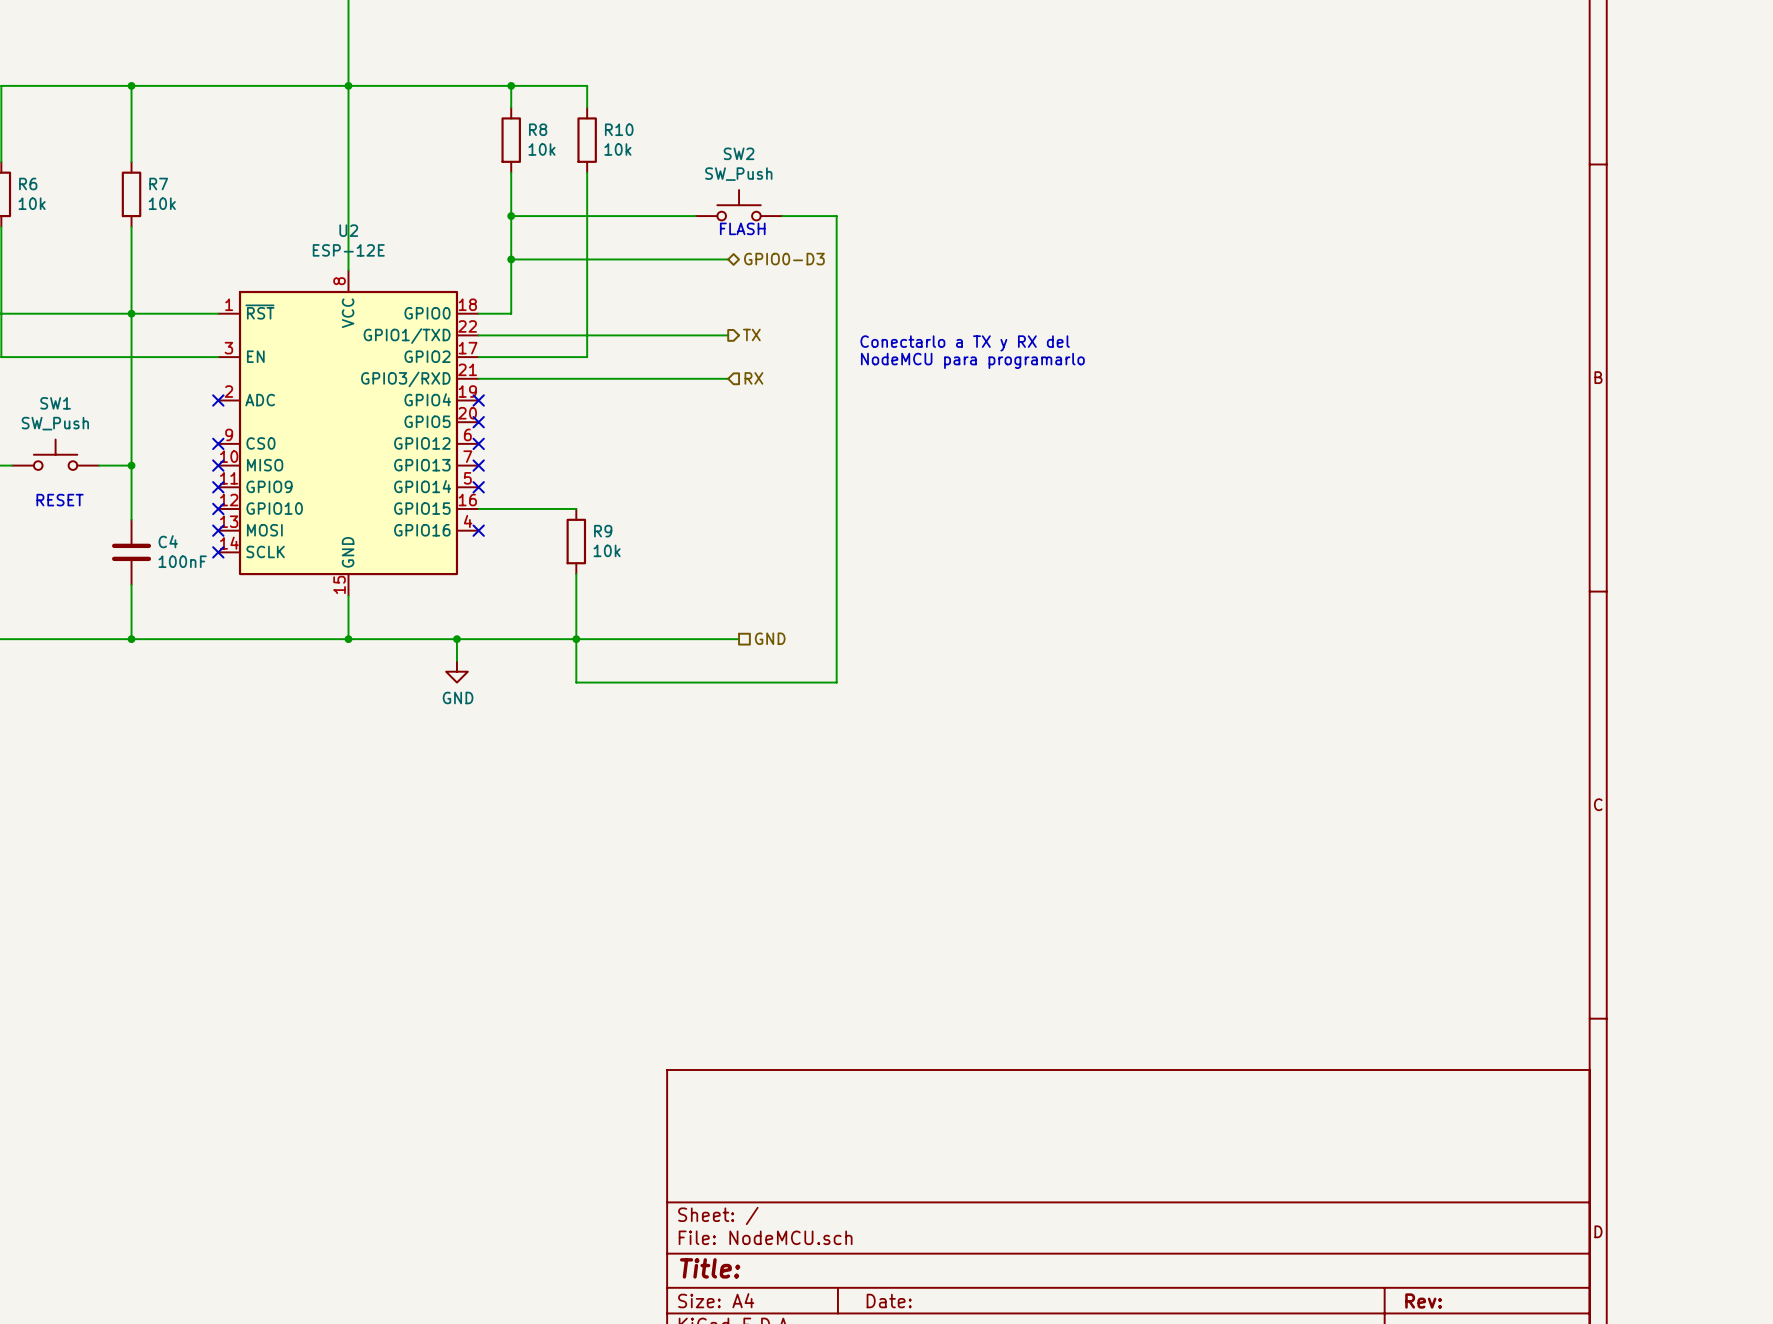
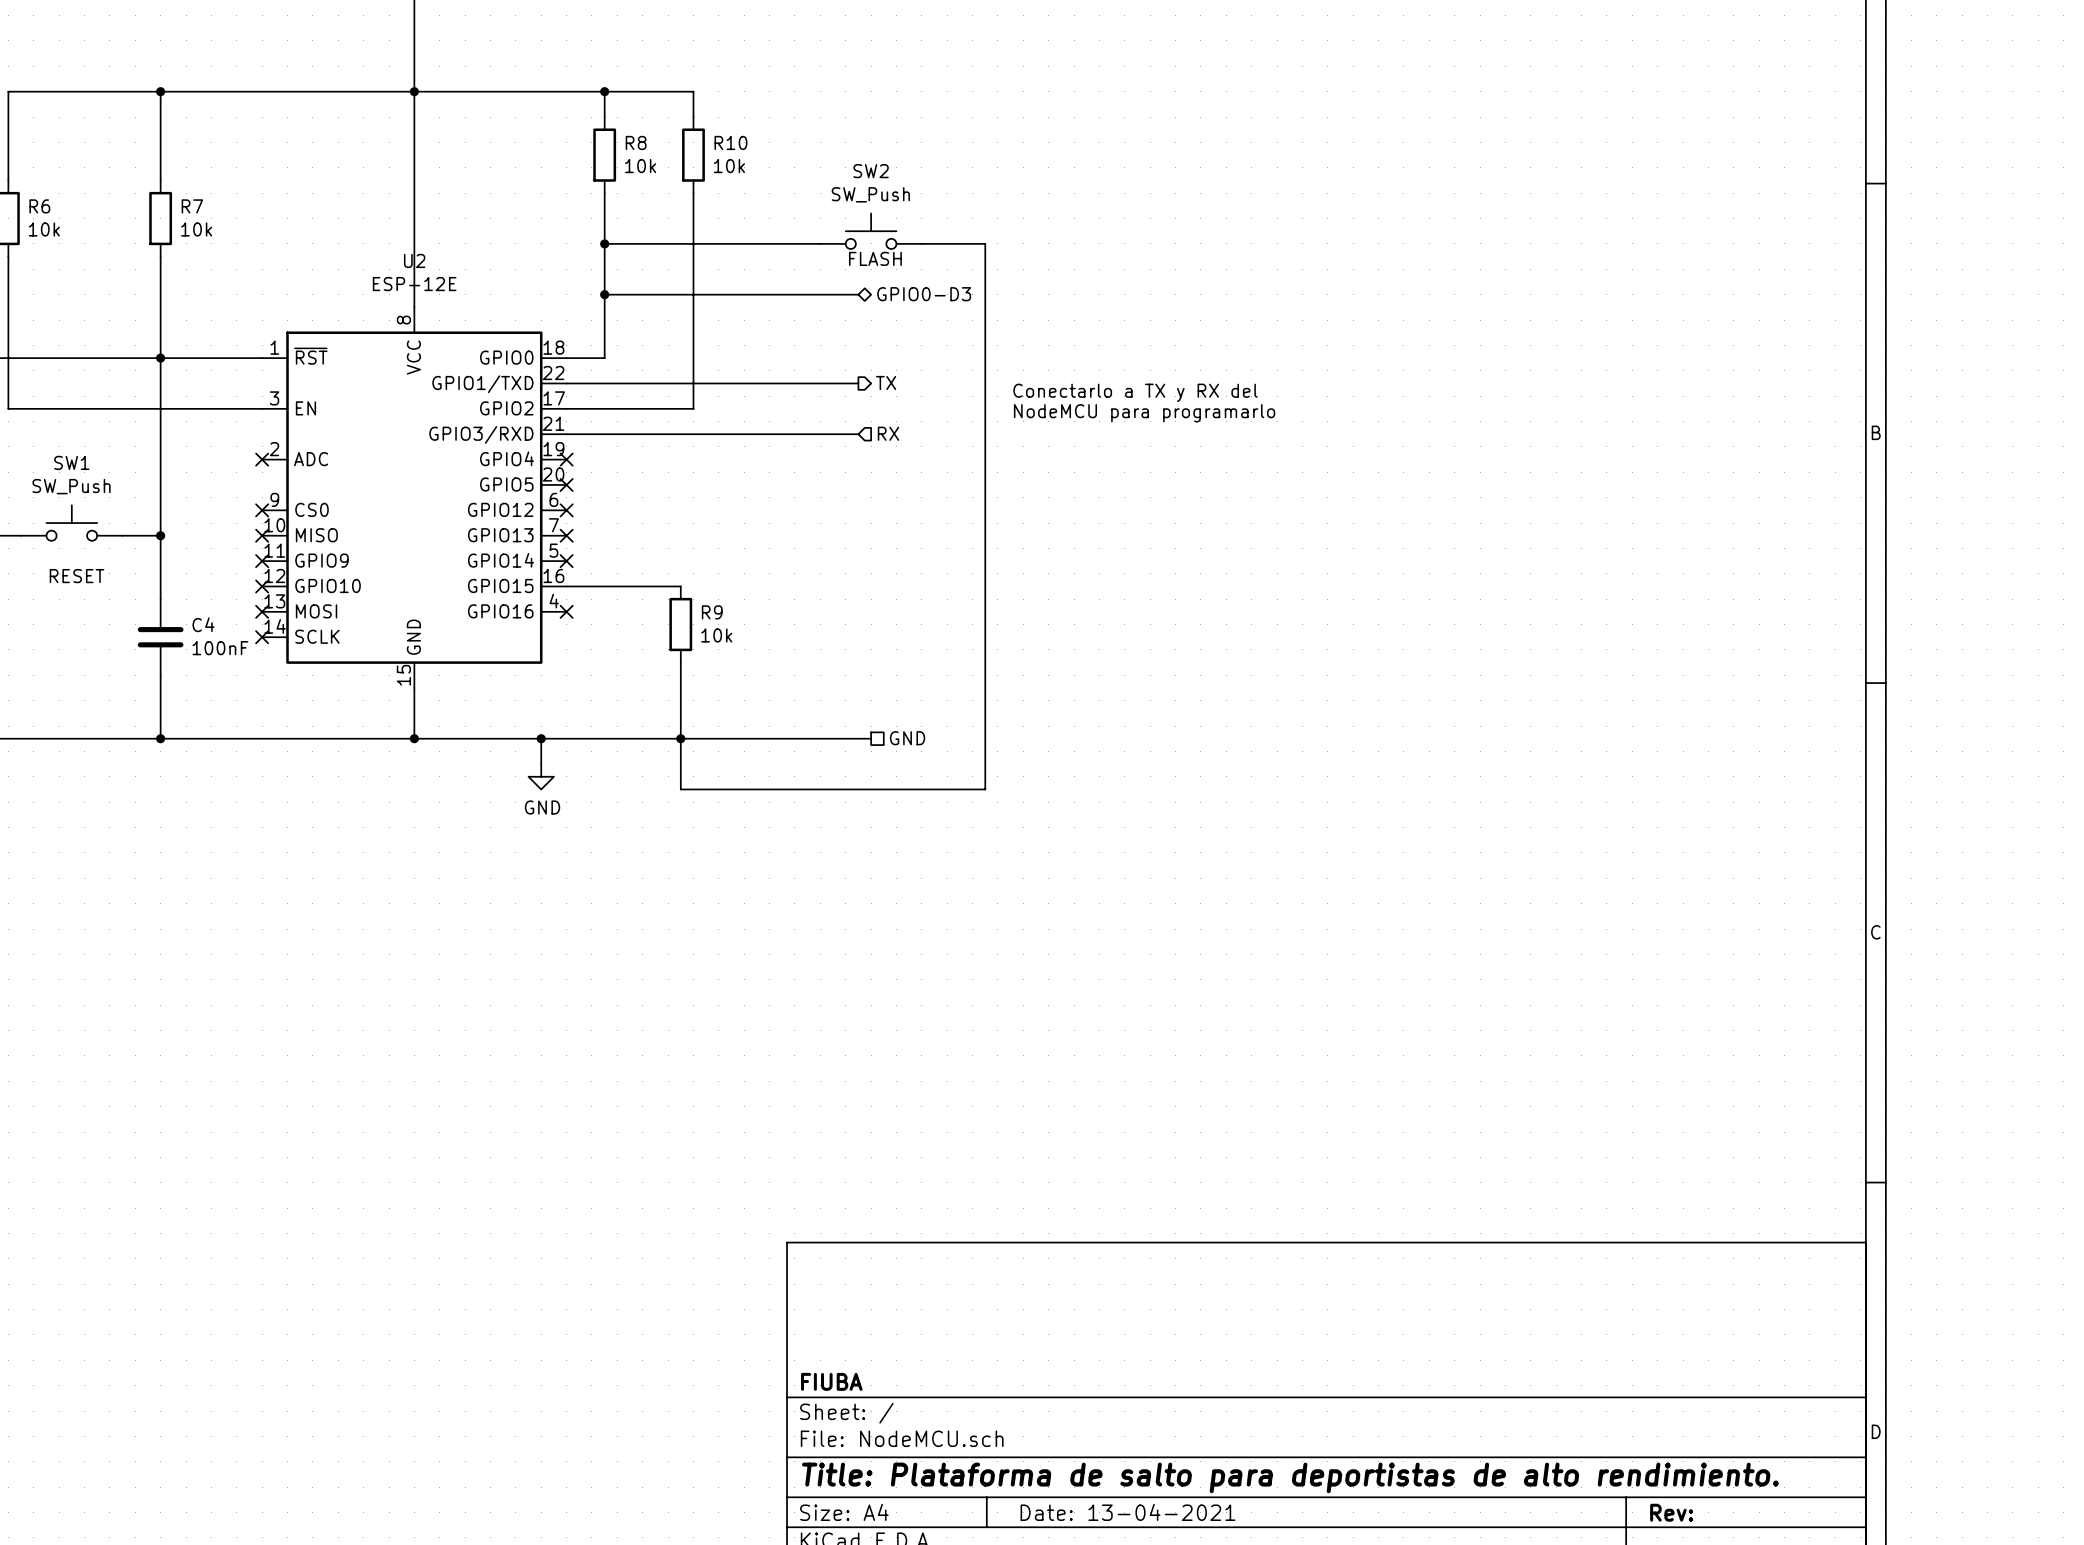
title block: none -> FIUBA (831, 1381)
title block: Title: (710, 1268) -> Title: Plataforma de salto para deportistas de alto rendimiento. (1290, 1477)
title block: Date: (889, 1301) -> Date: 13-04-2021 (1128, 1512)

